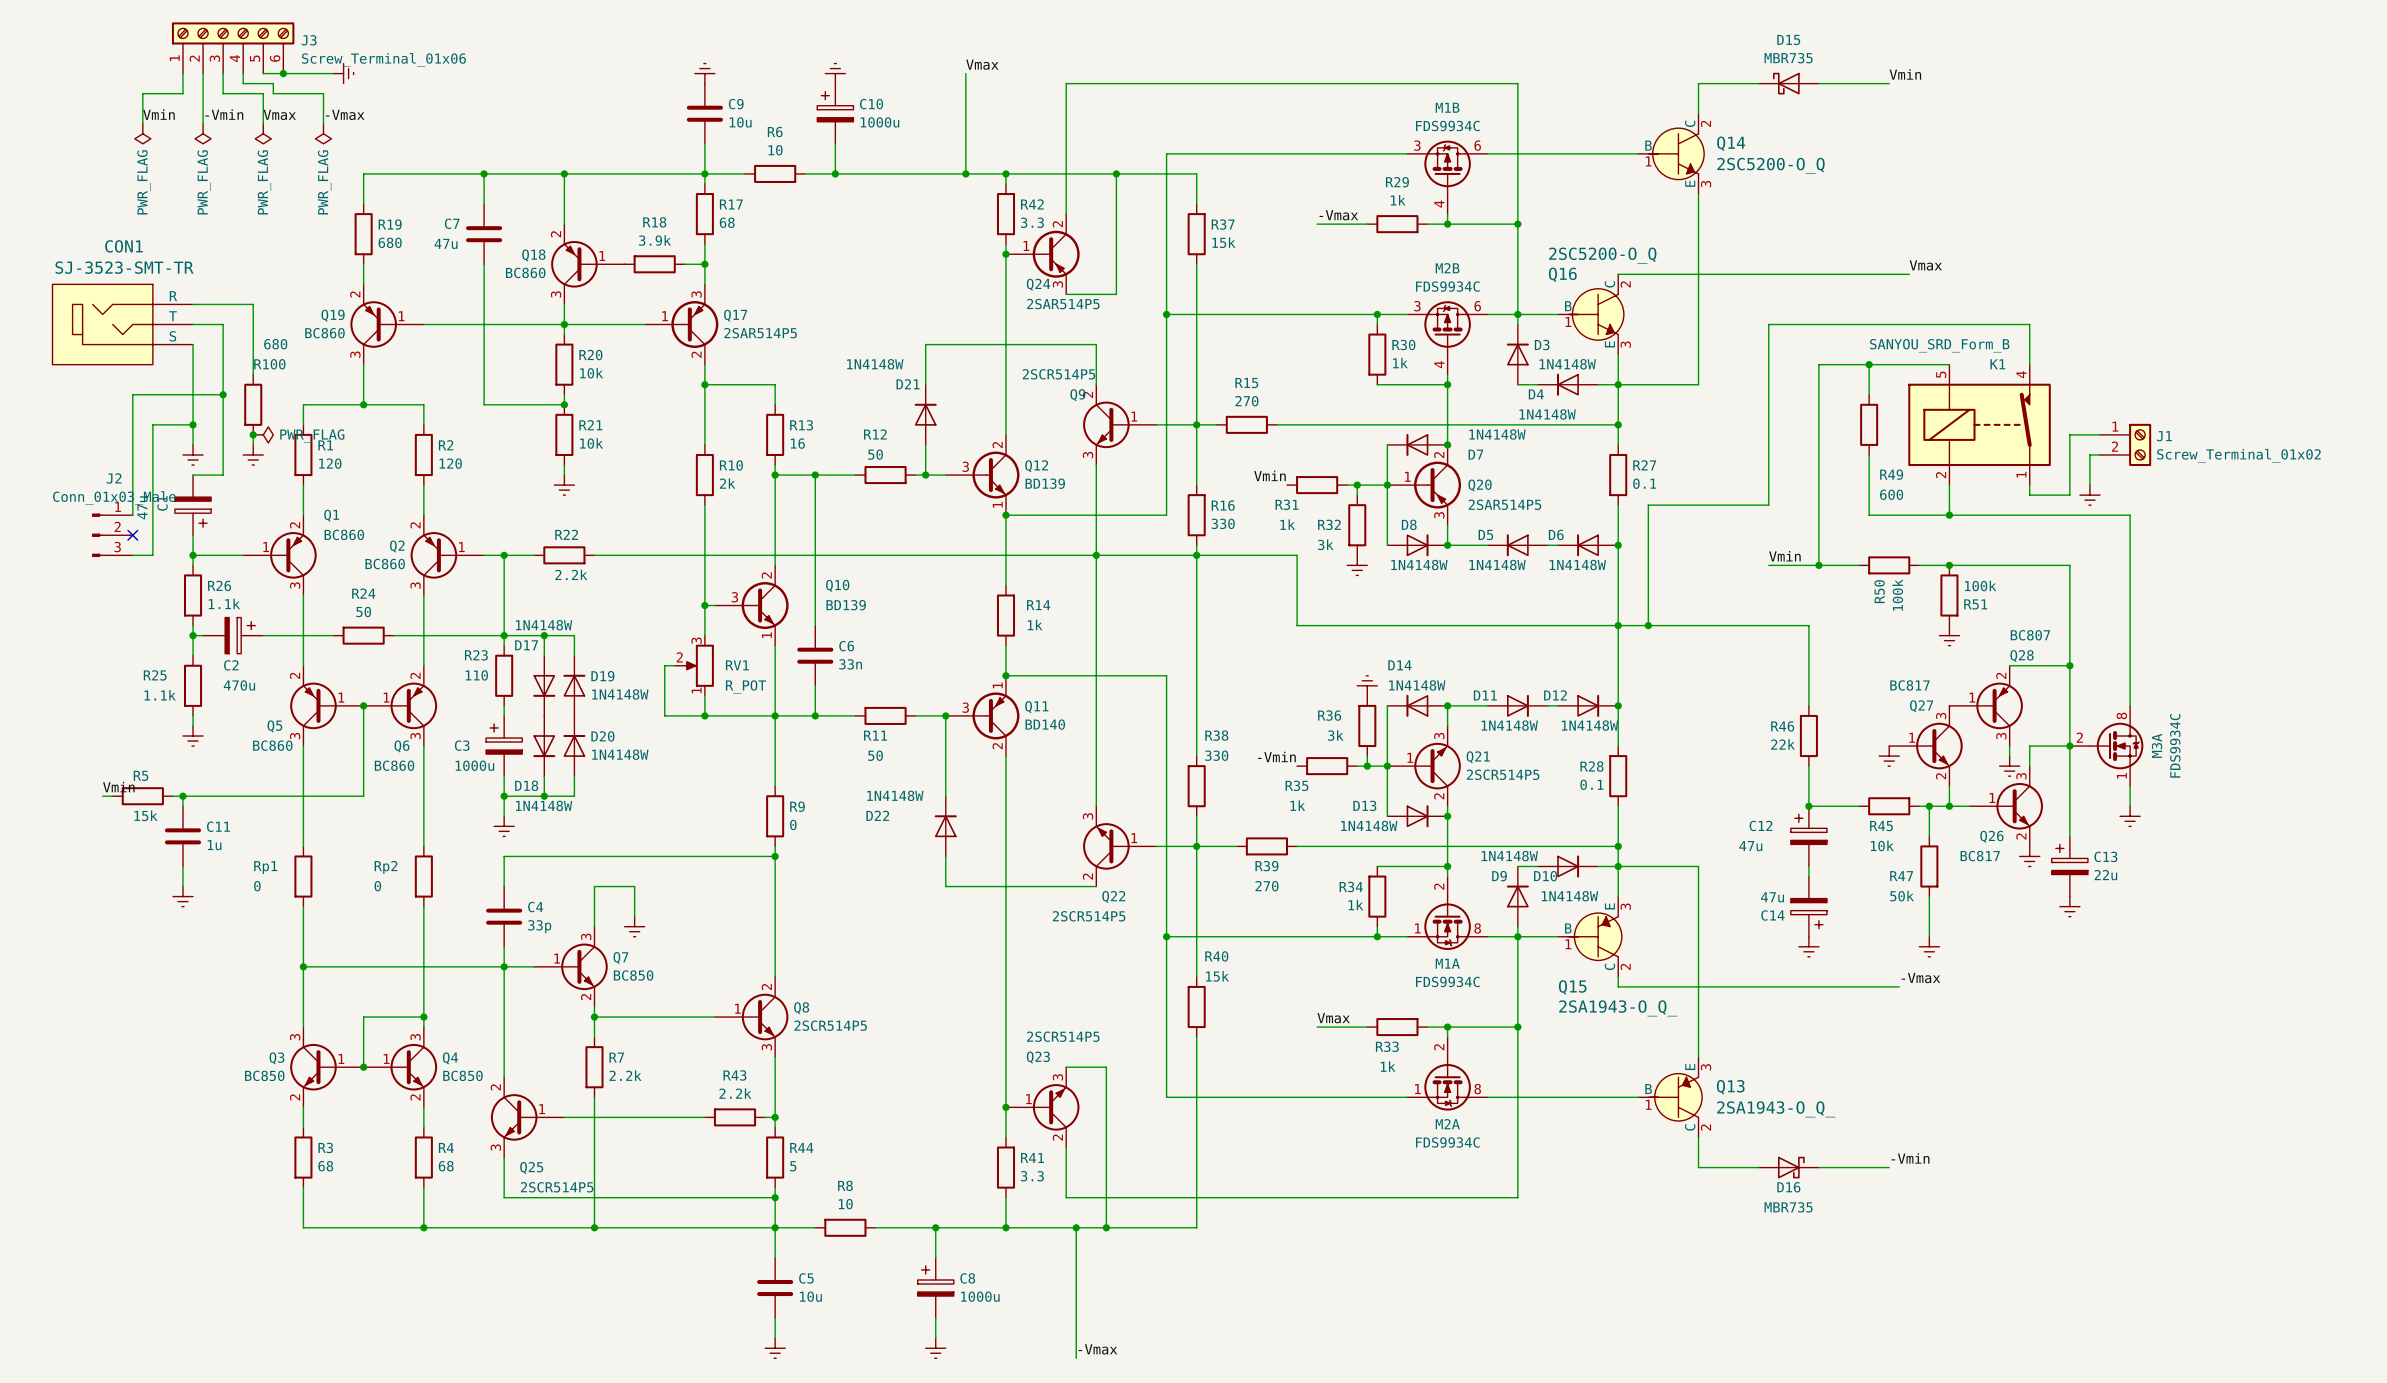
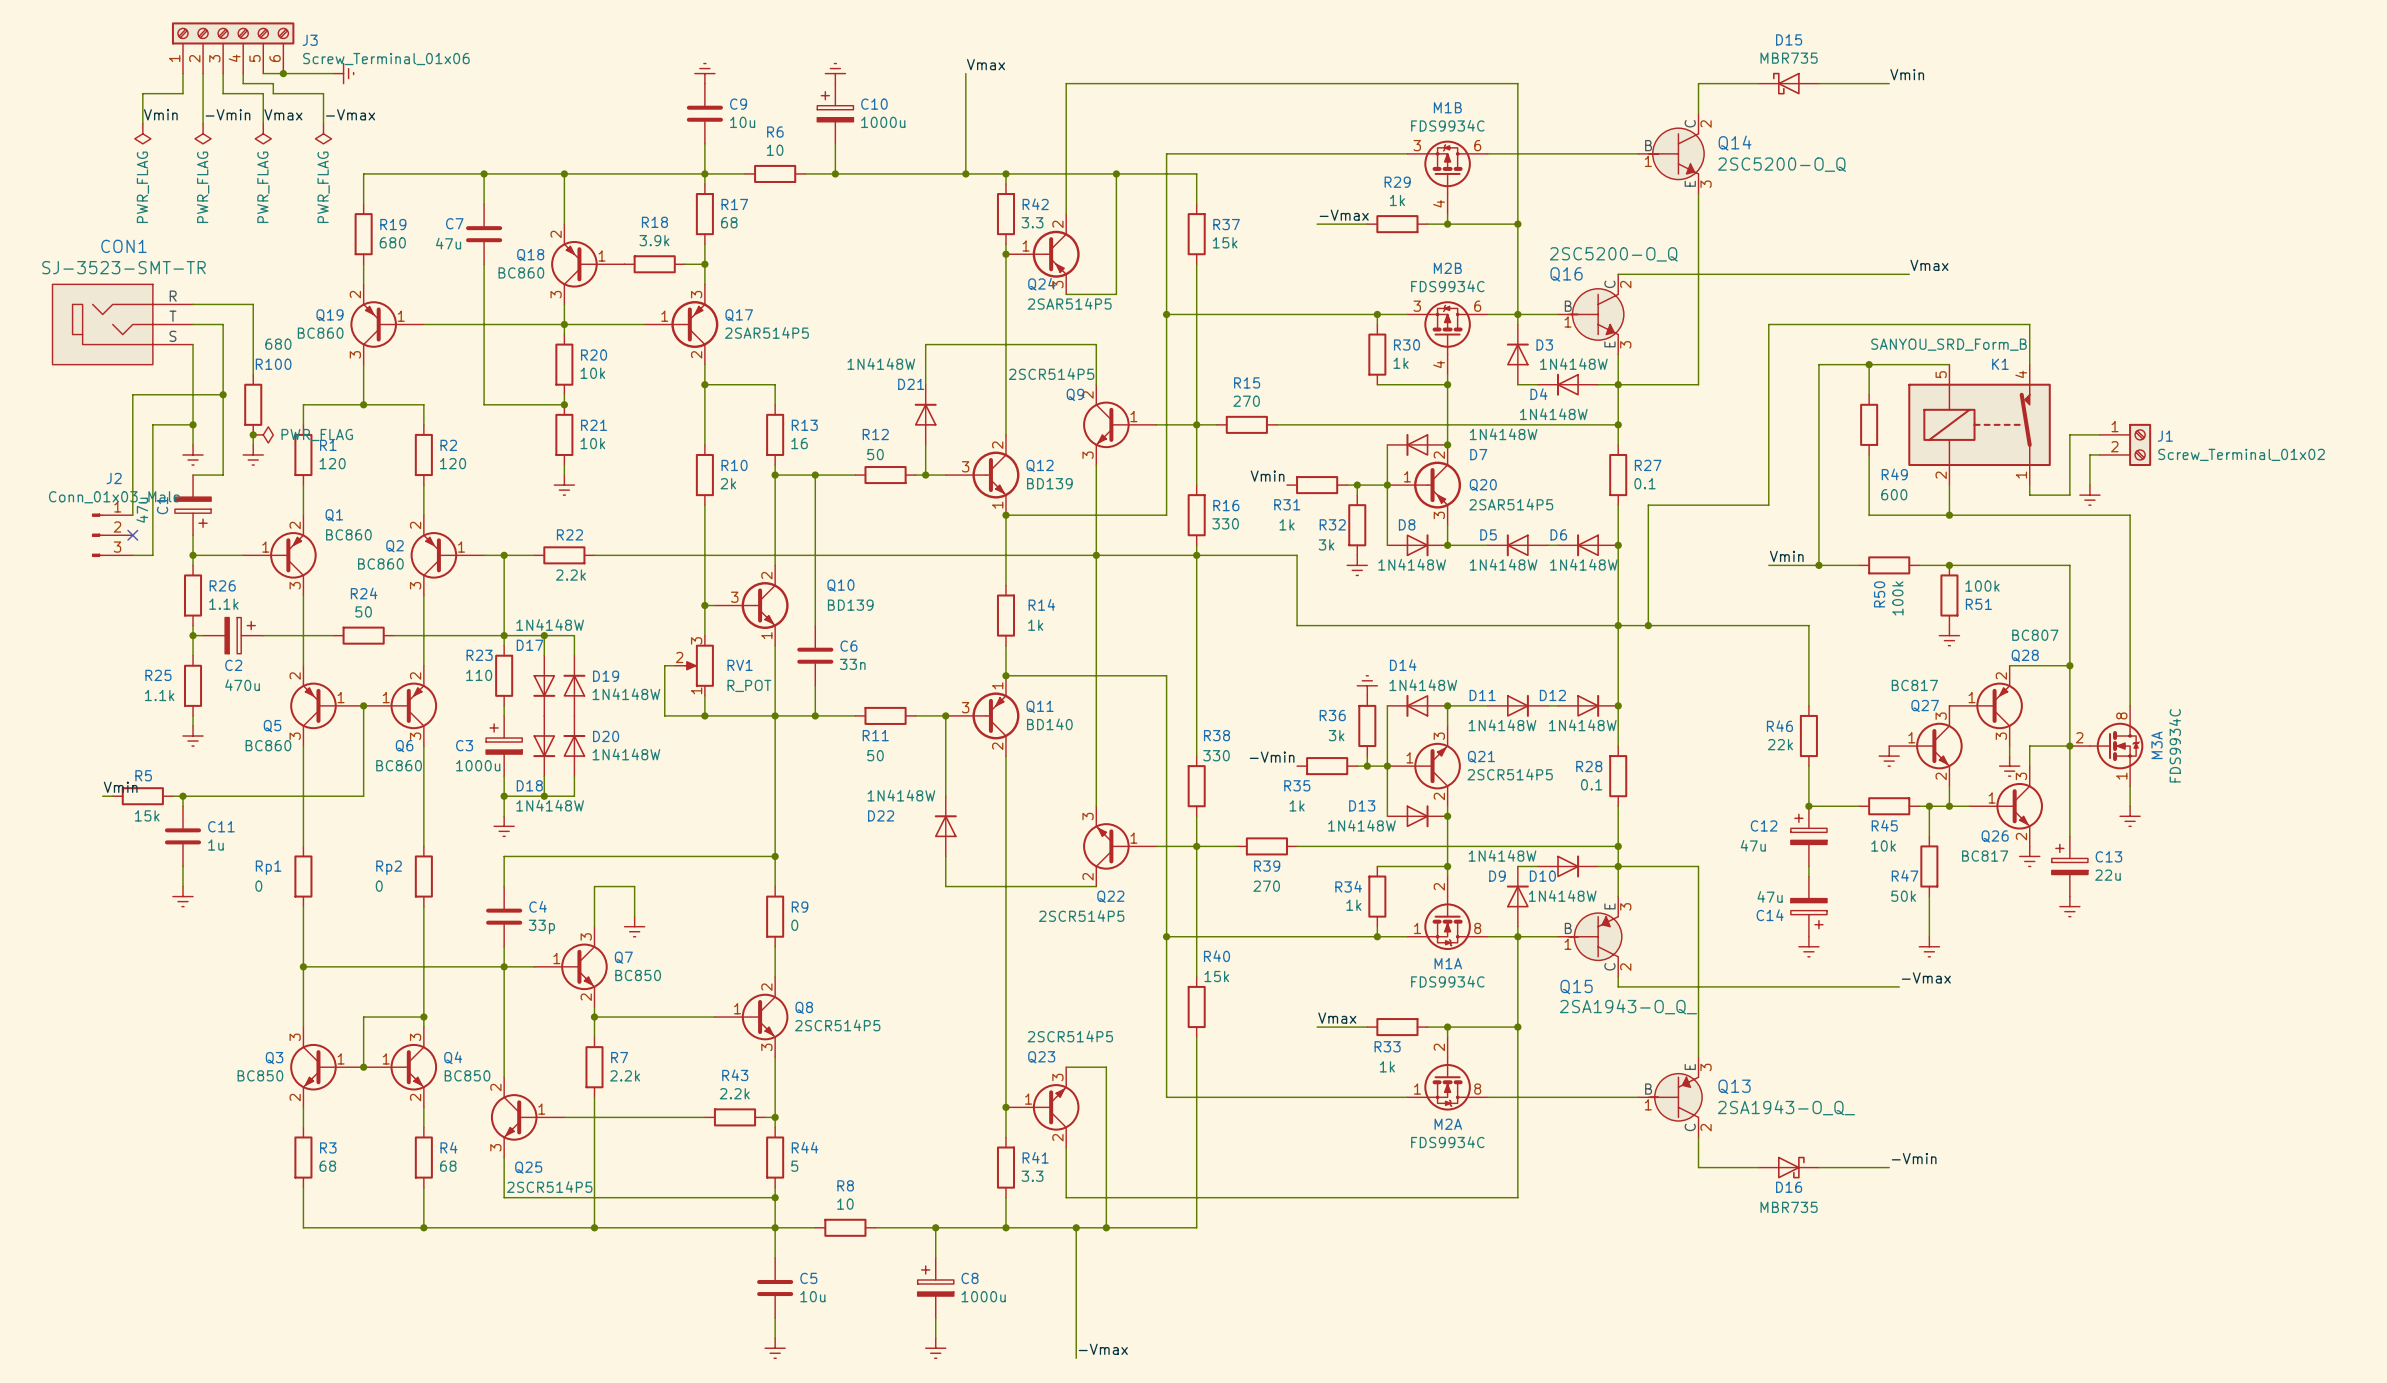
R9 position: (775, 816) -> (775, 916)
wire: (775, 886) (775, 946) -> (775, 786) (775, 846)

